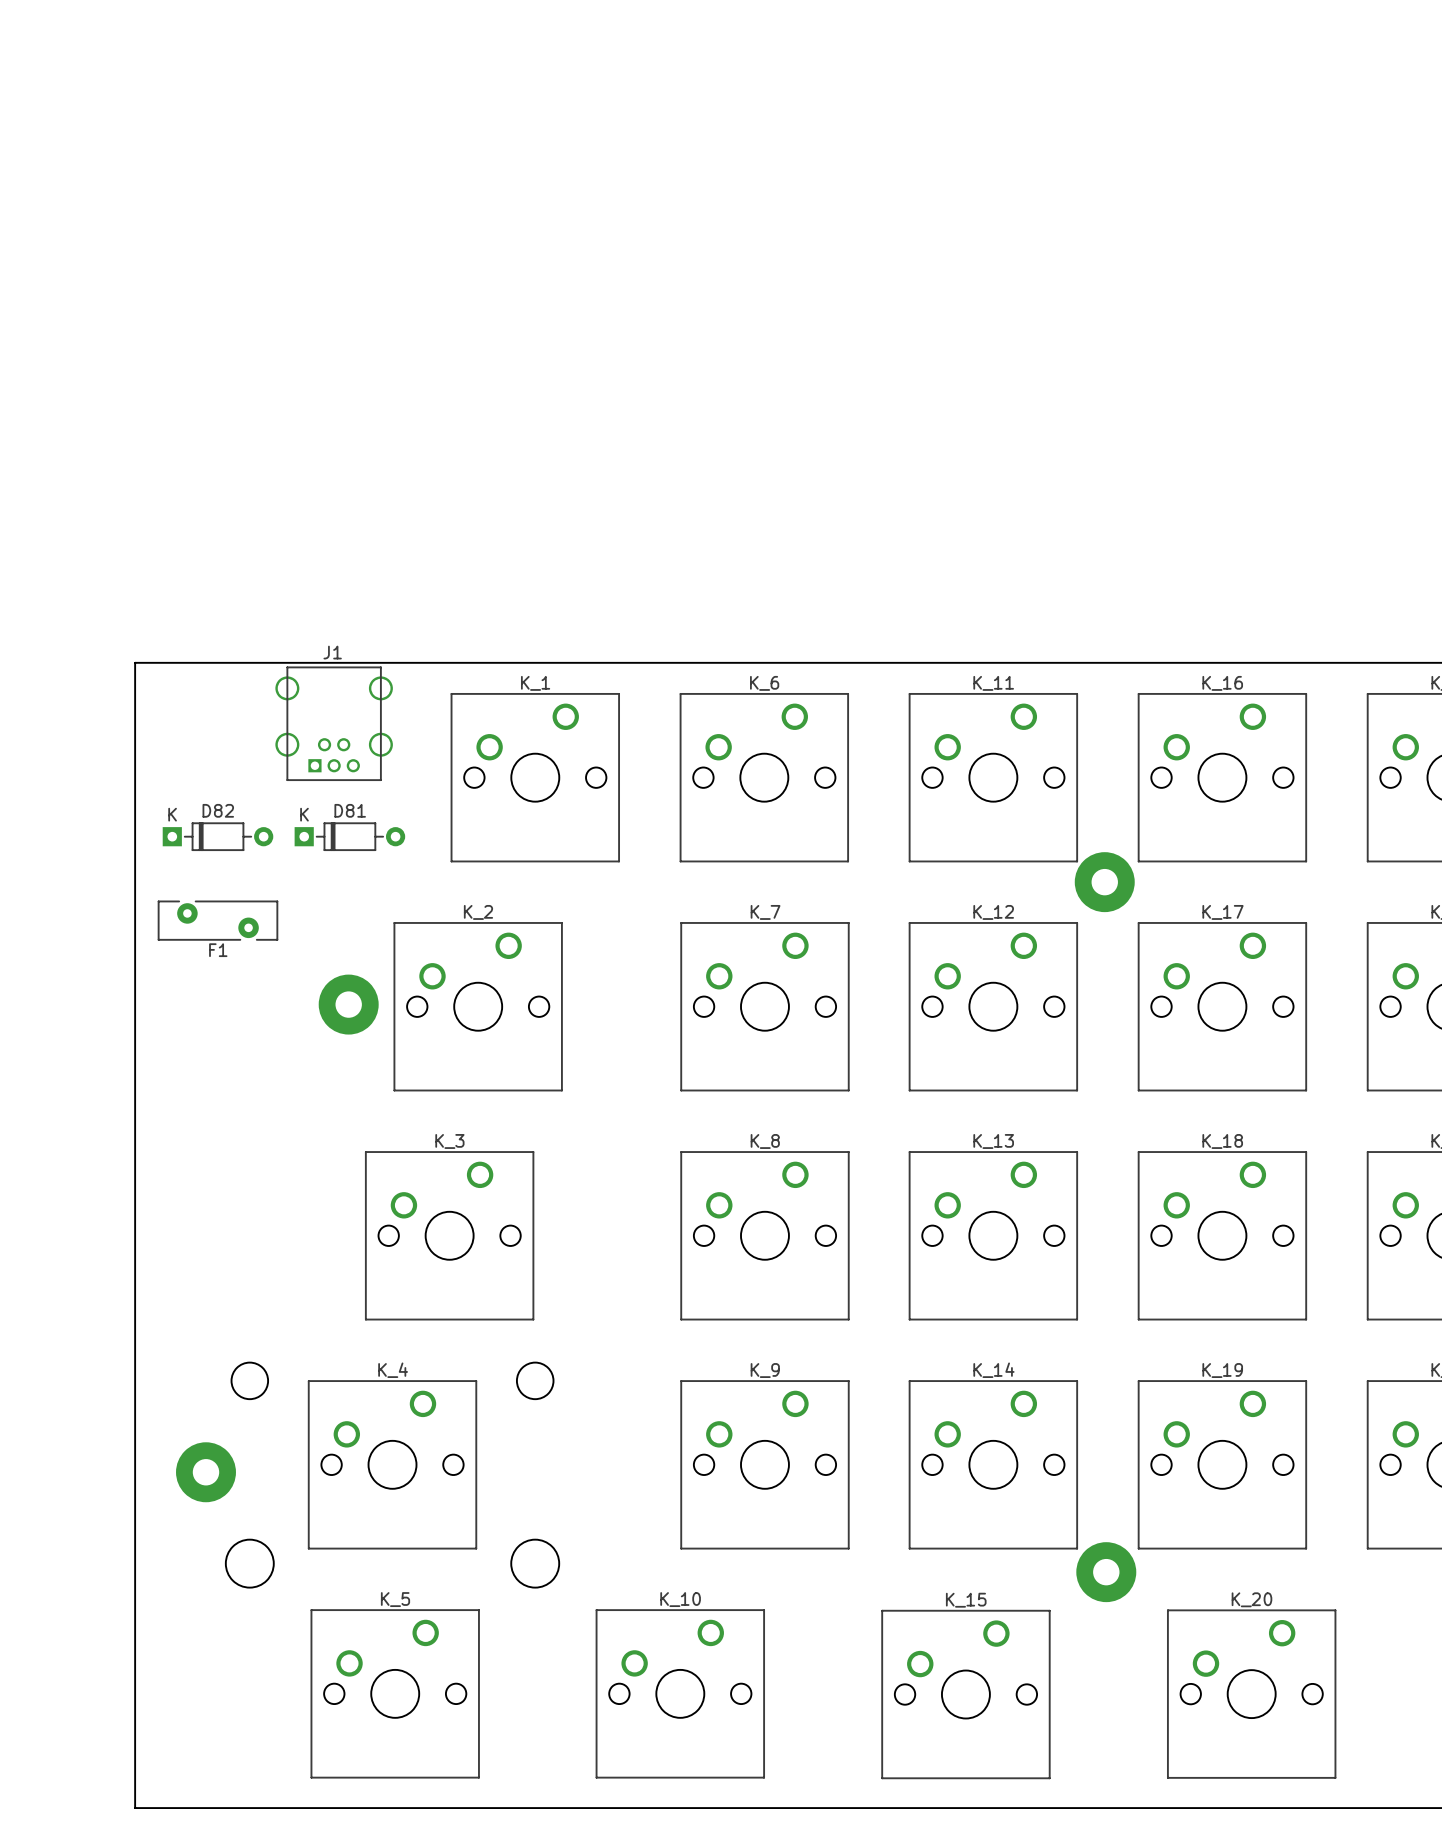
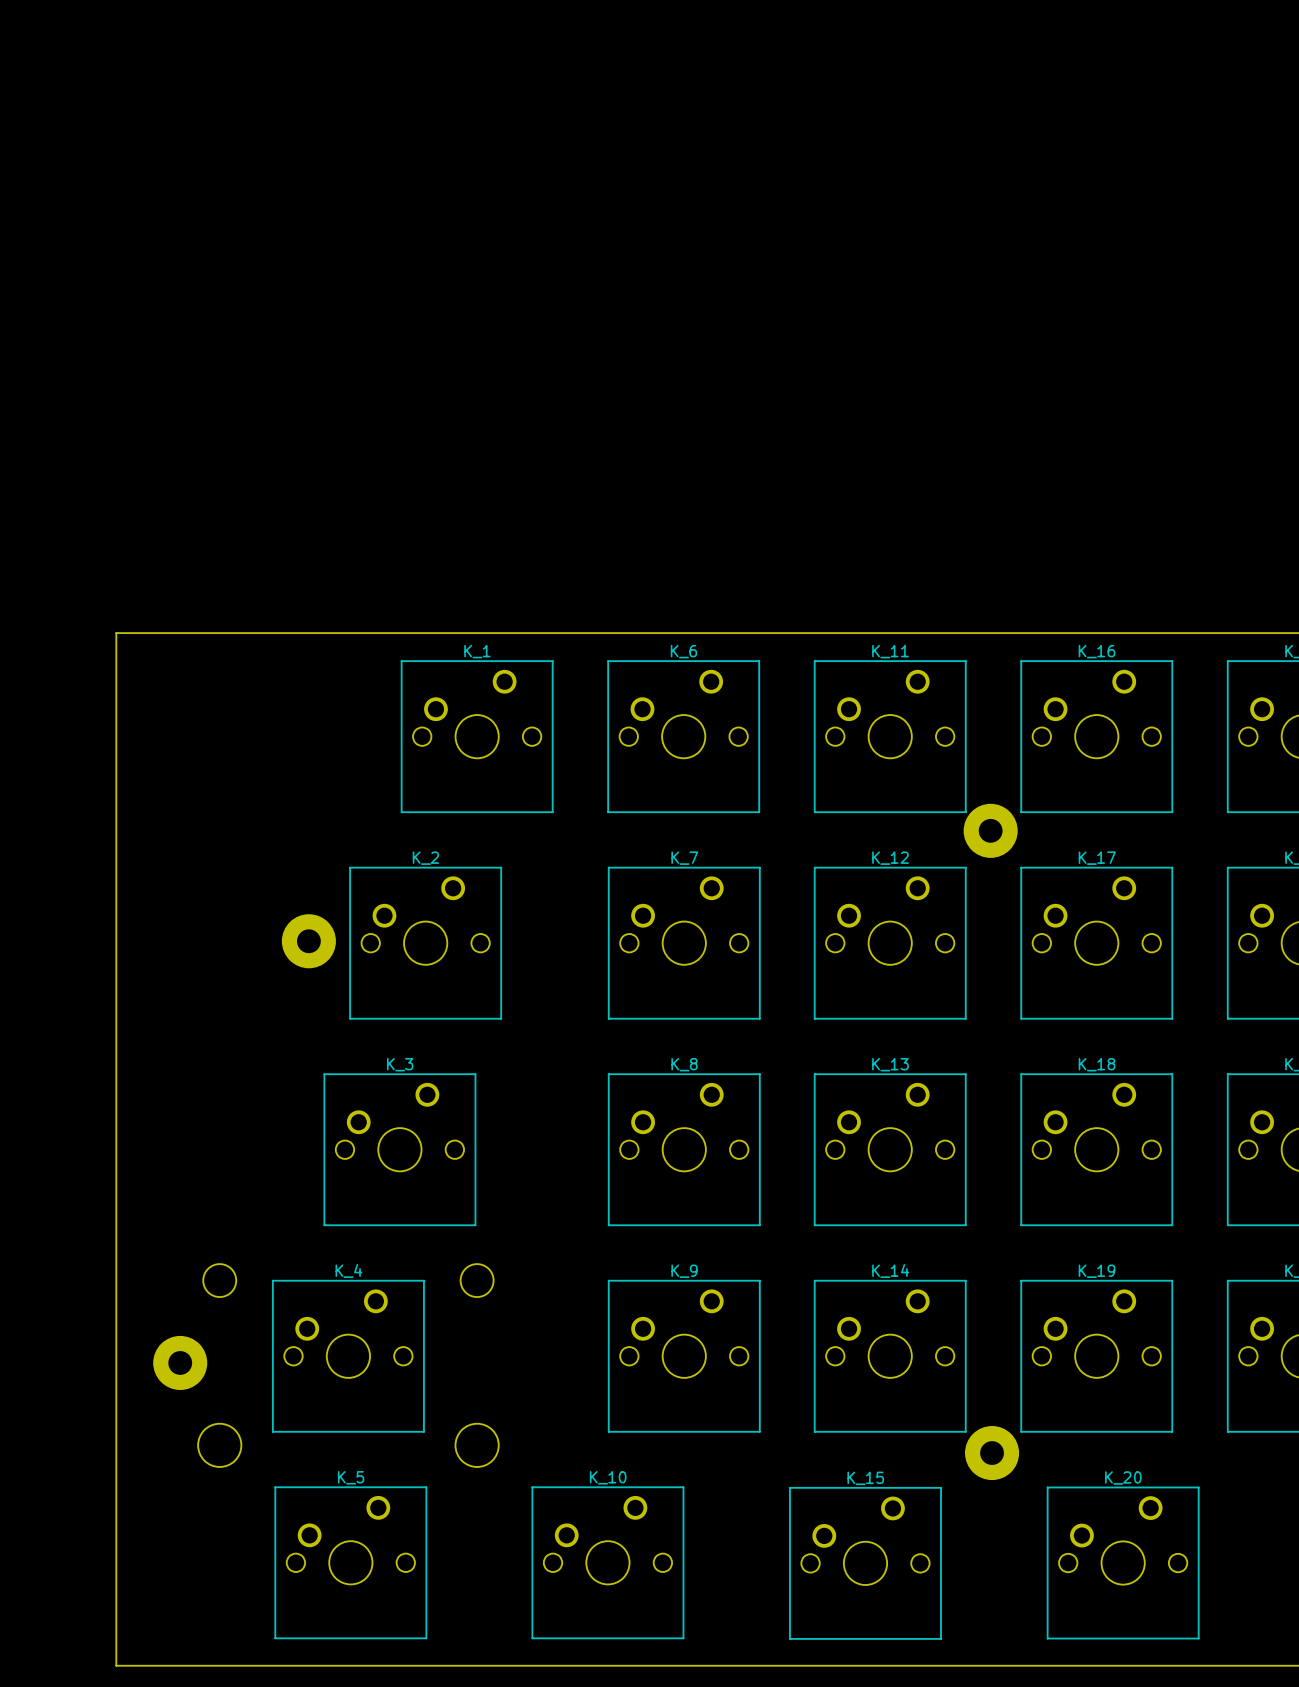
J1: (334, 723) -> none
D82: (217, 836) -> none
D81: (349, 836) -> none
F1: (217, 920) -> none

